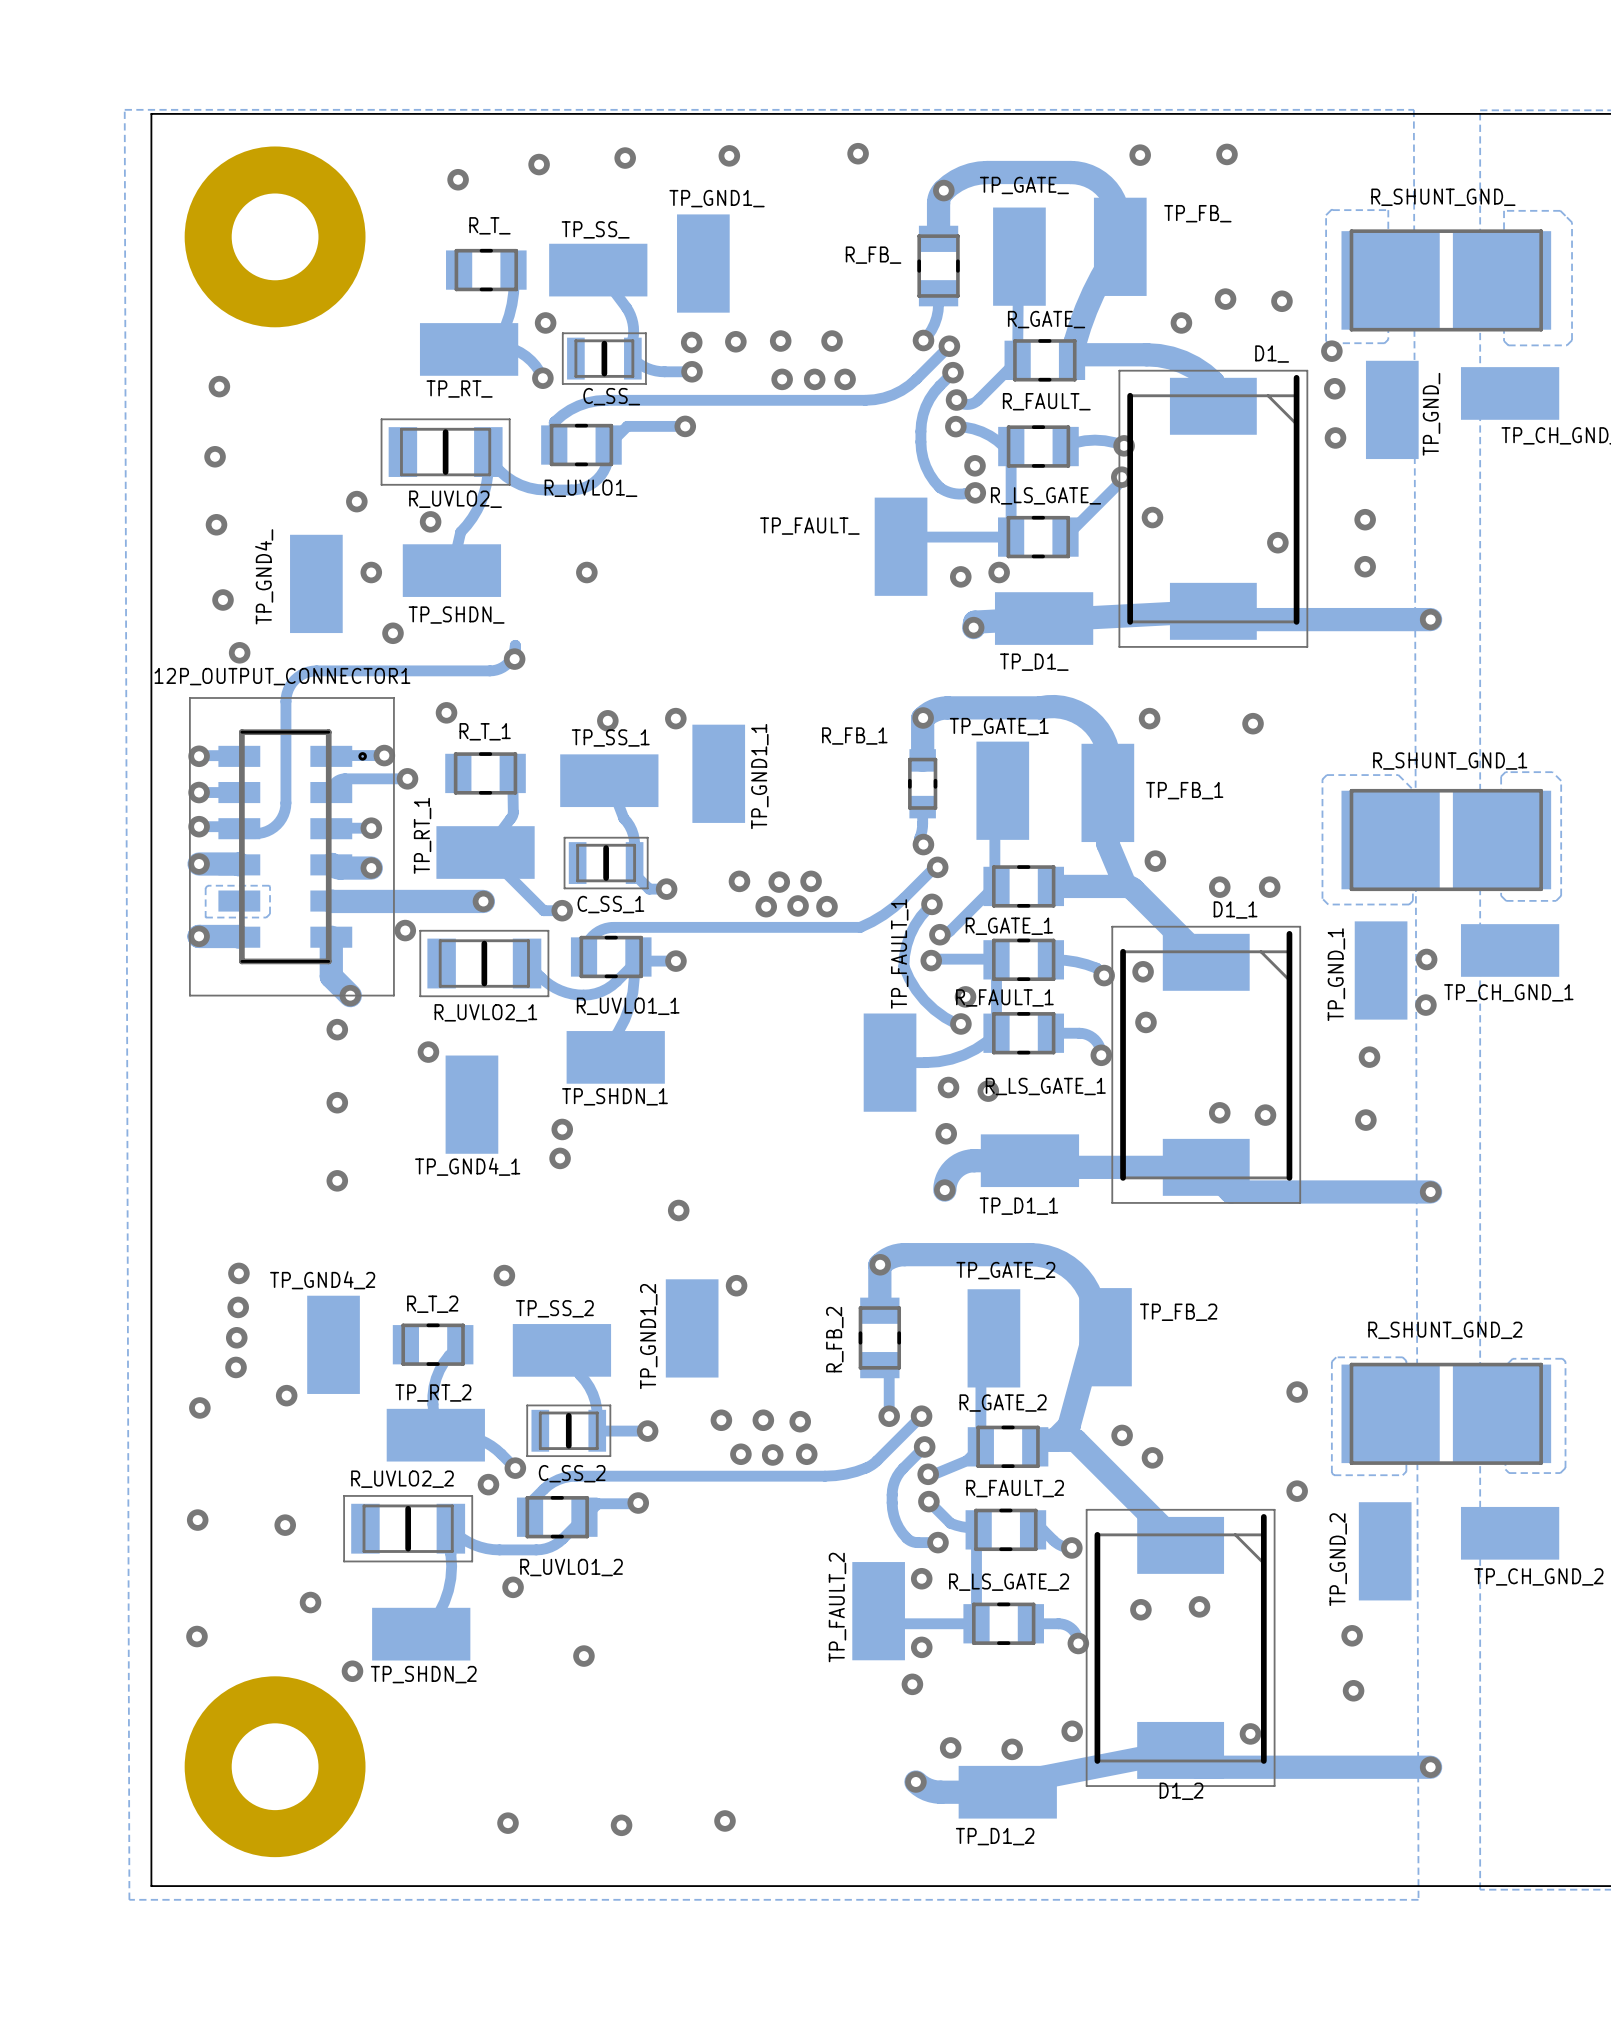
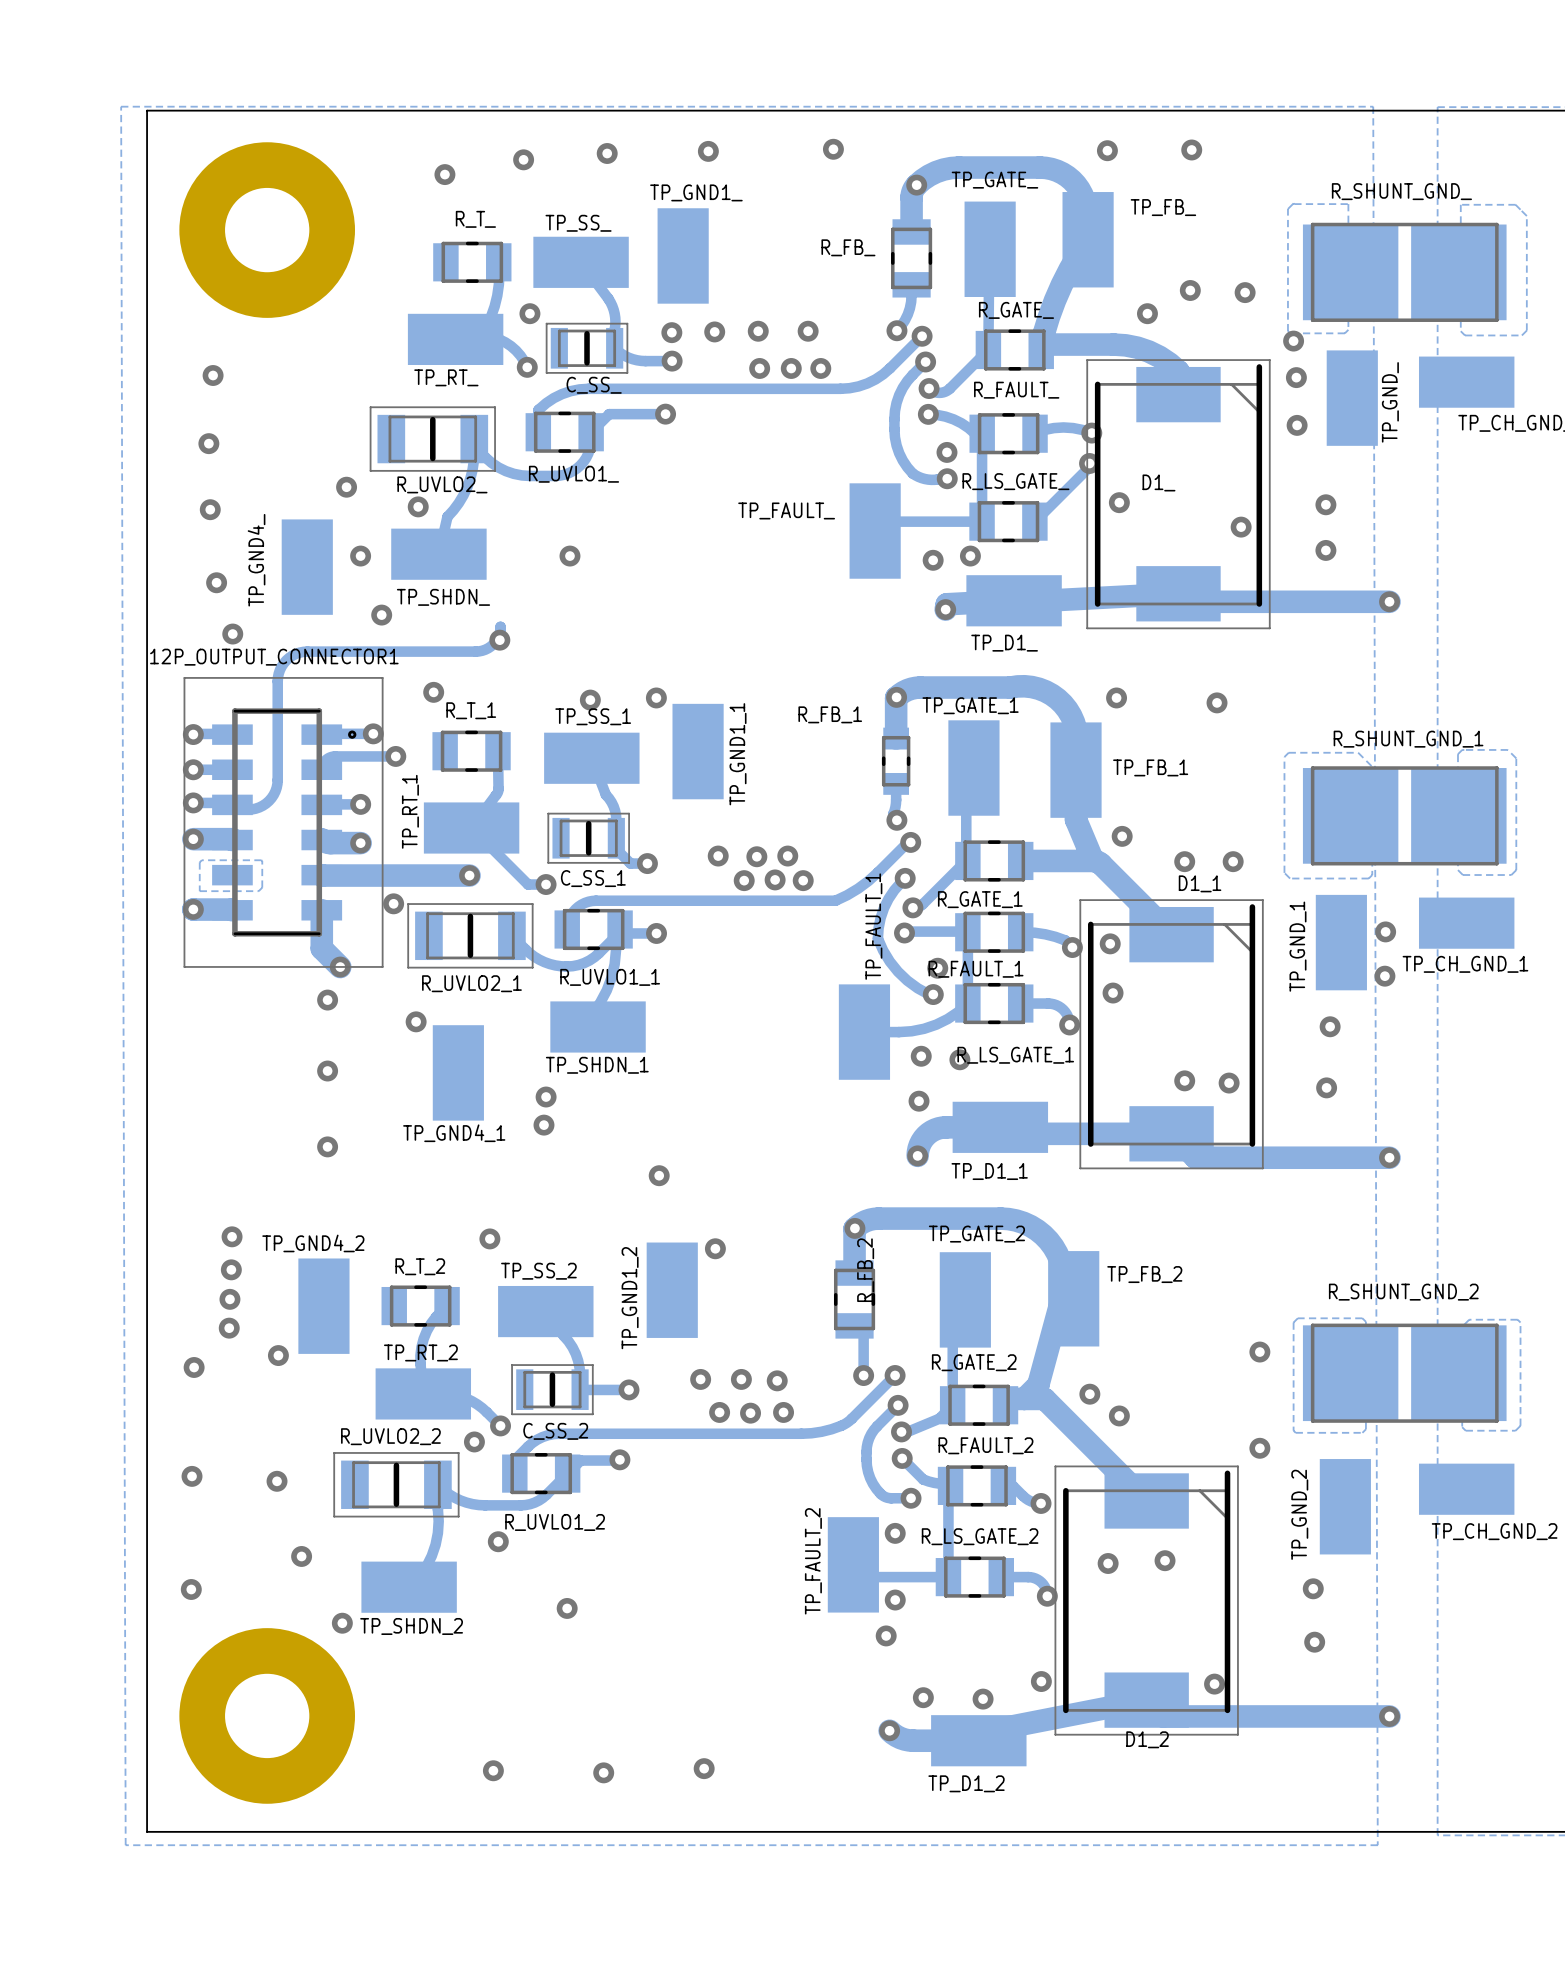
D1_ name position: D1_ (1272, 354) -> D1_ (1158, 482)
R_FB_2 name position: R_FB_2 (834, 1339) -> R_FB_2 (865, 1270)

